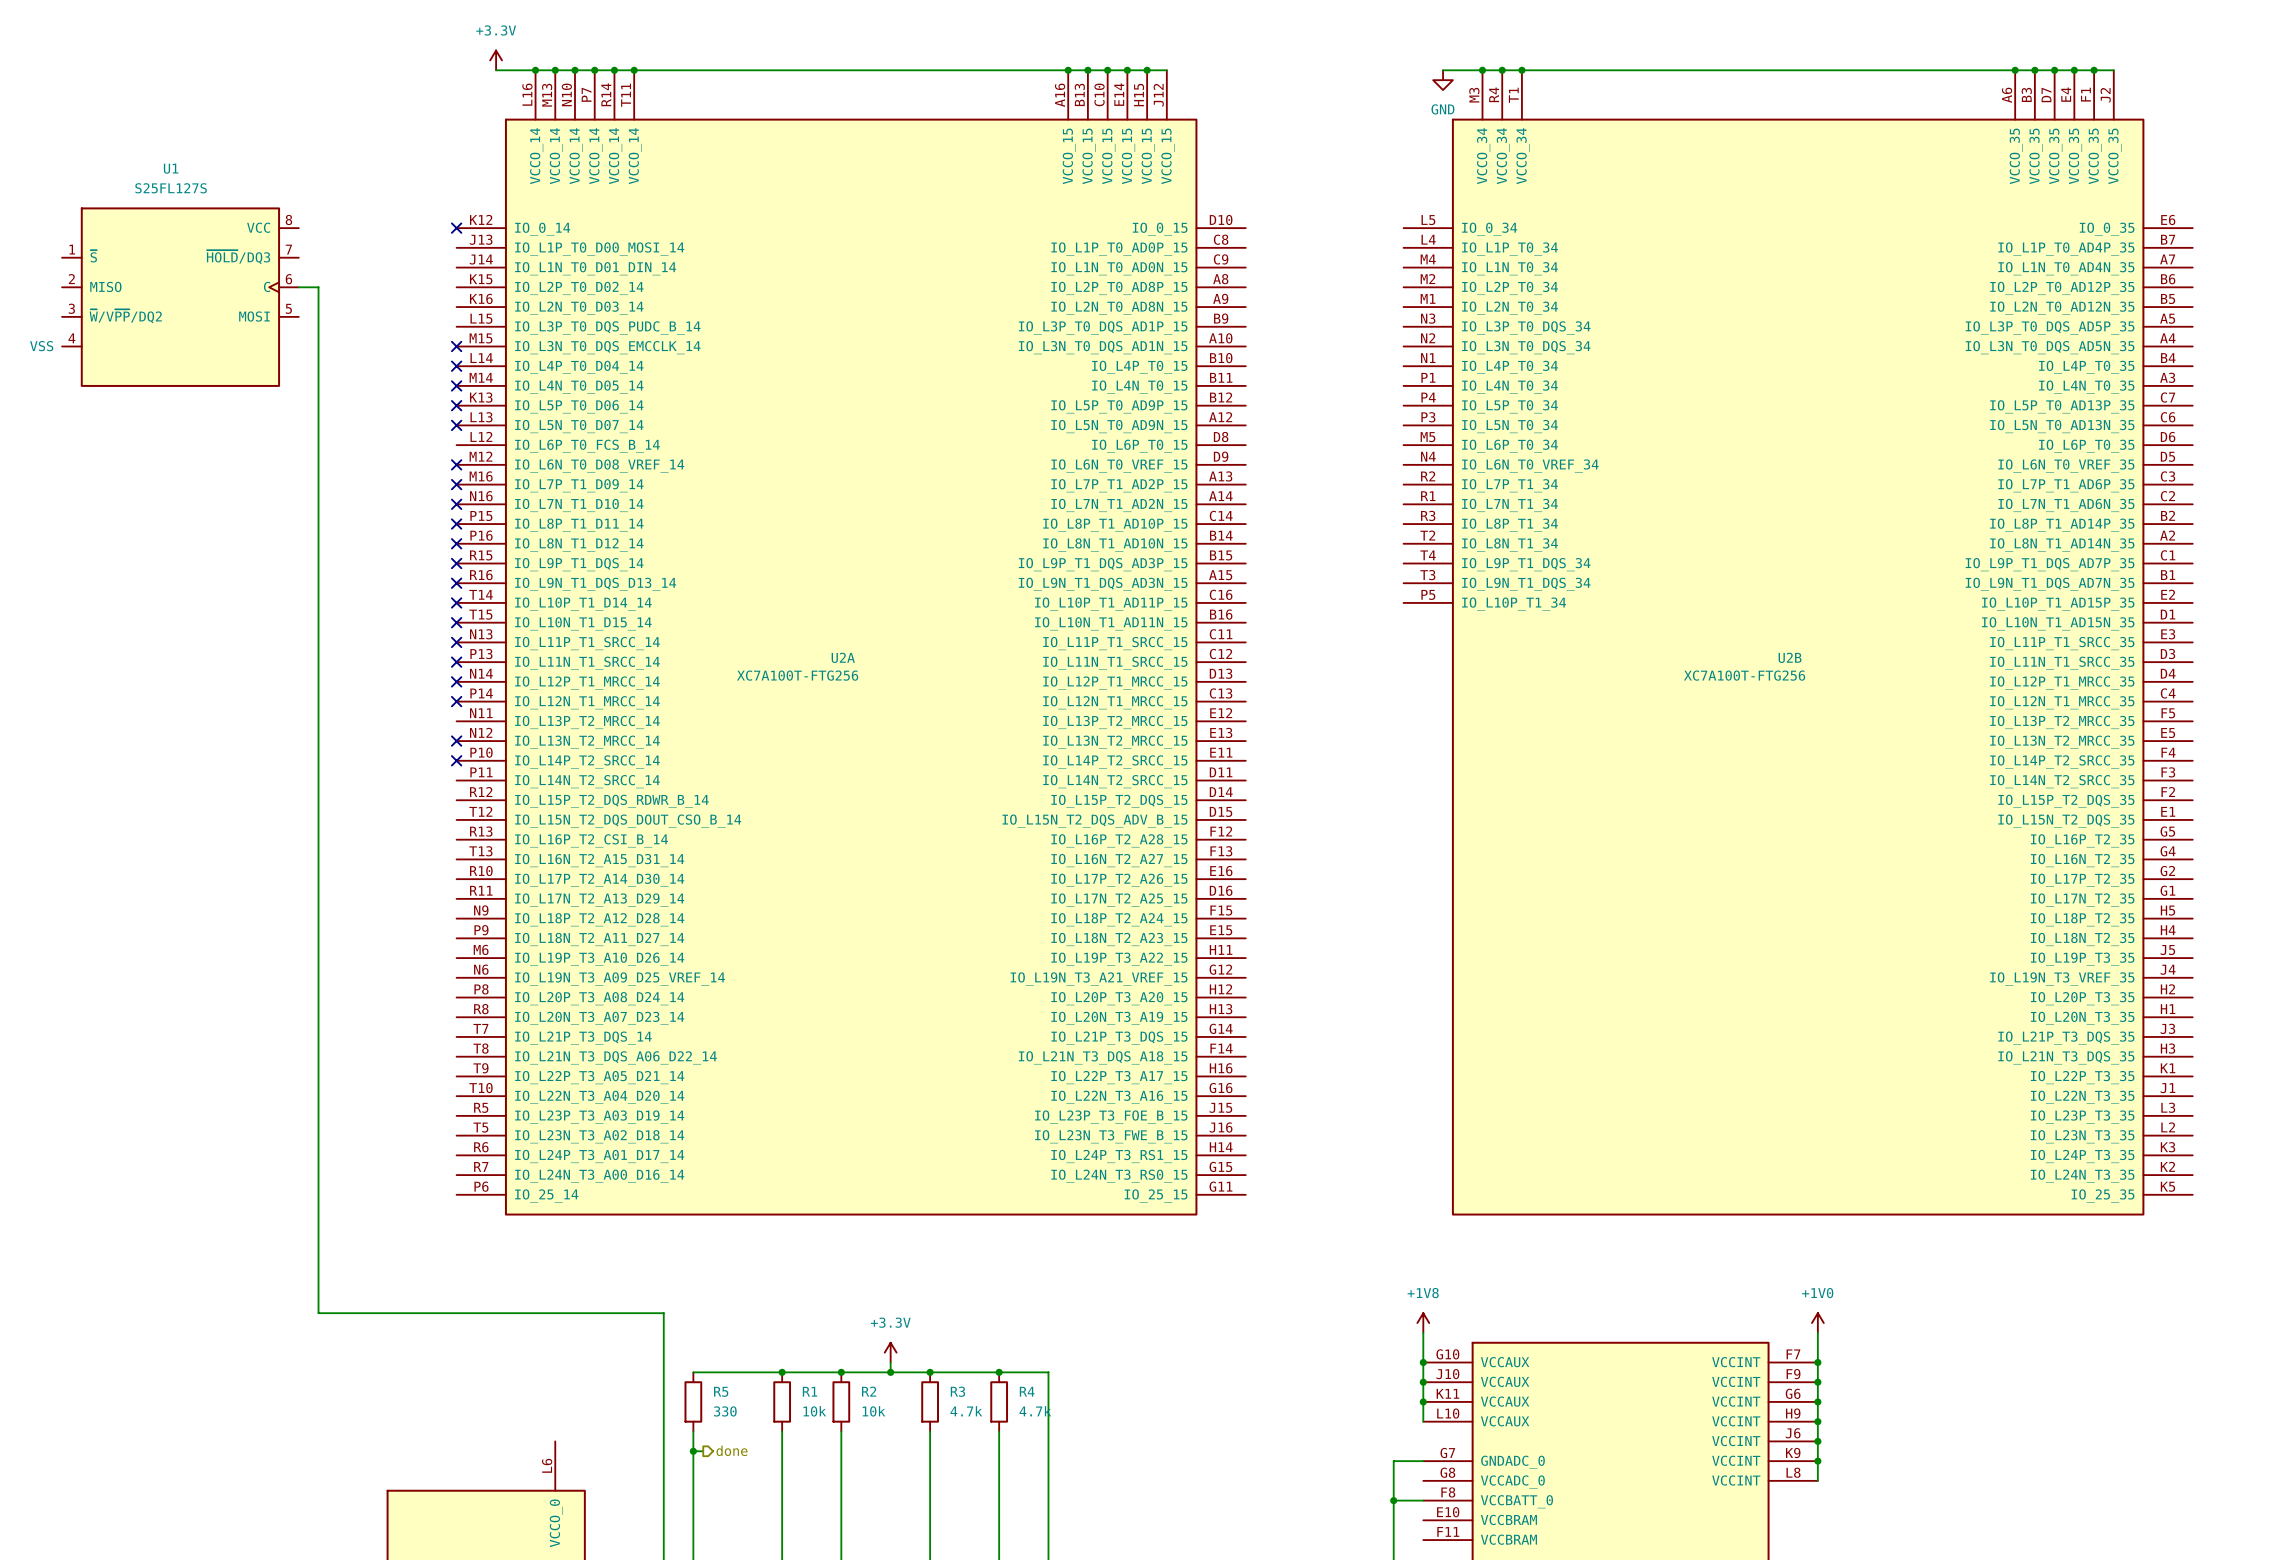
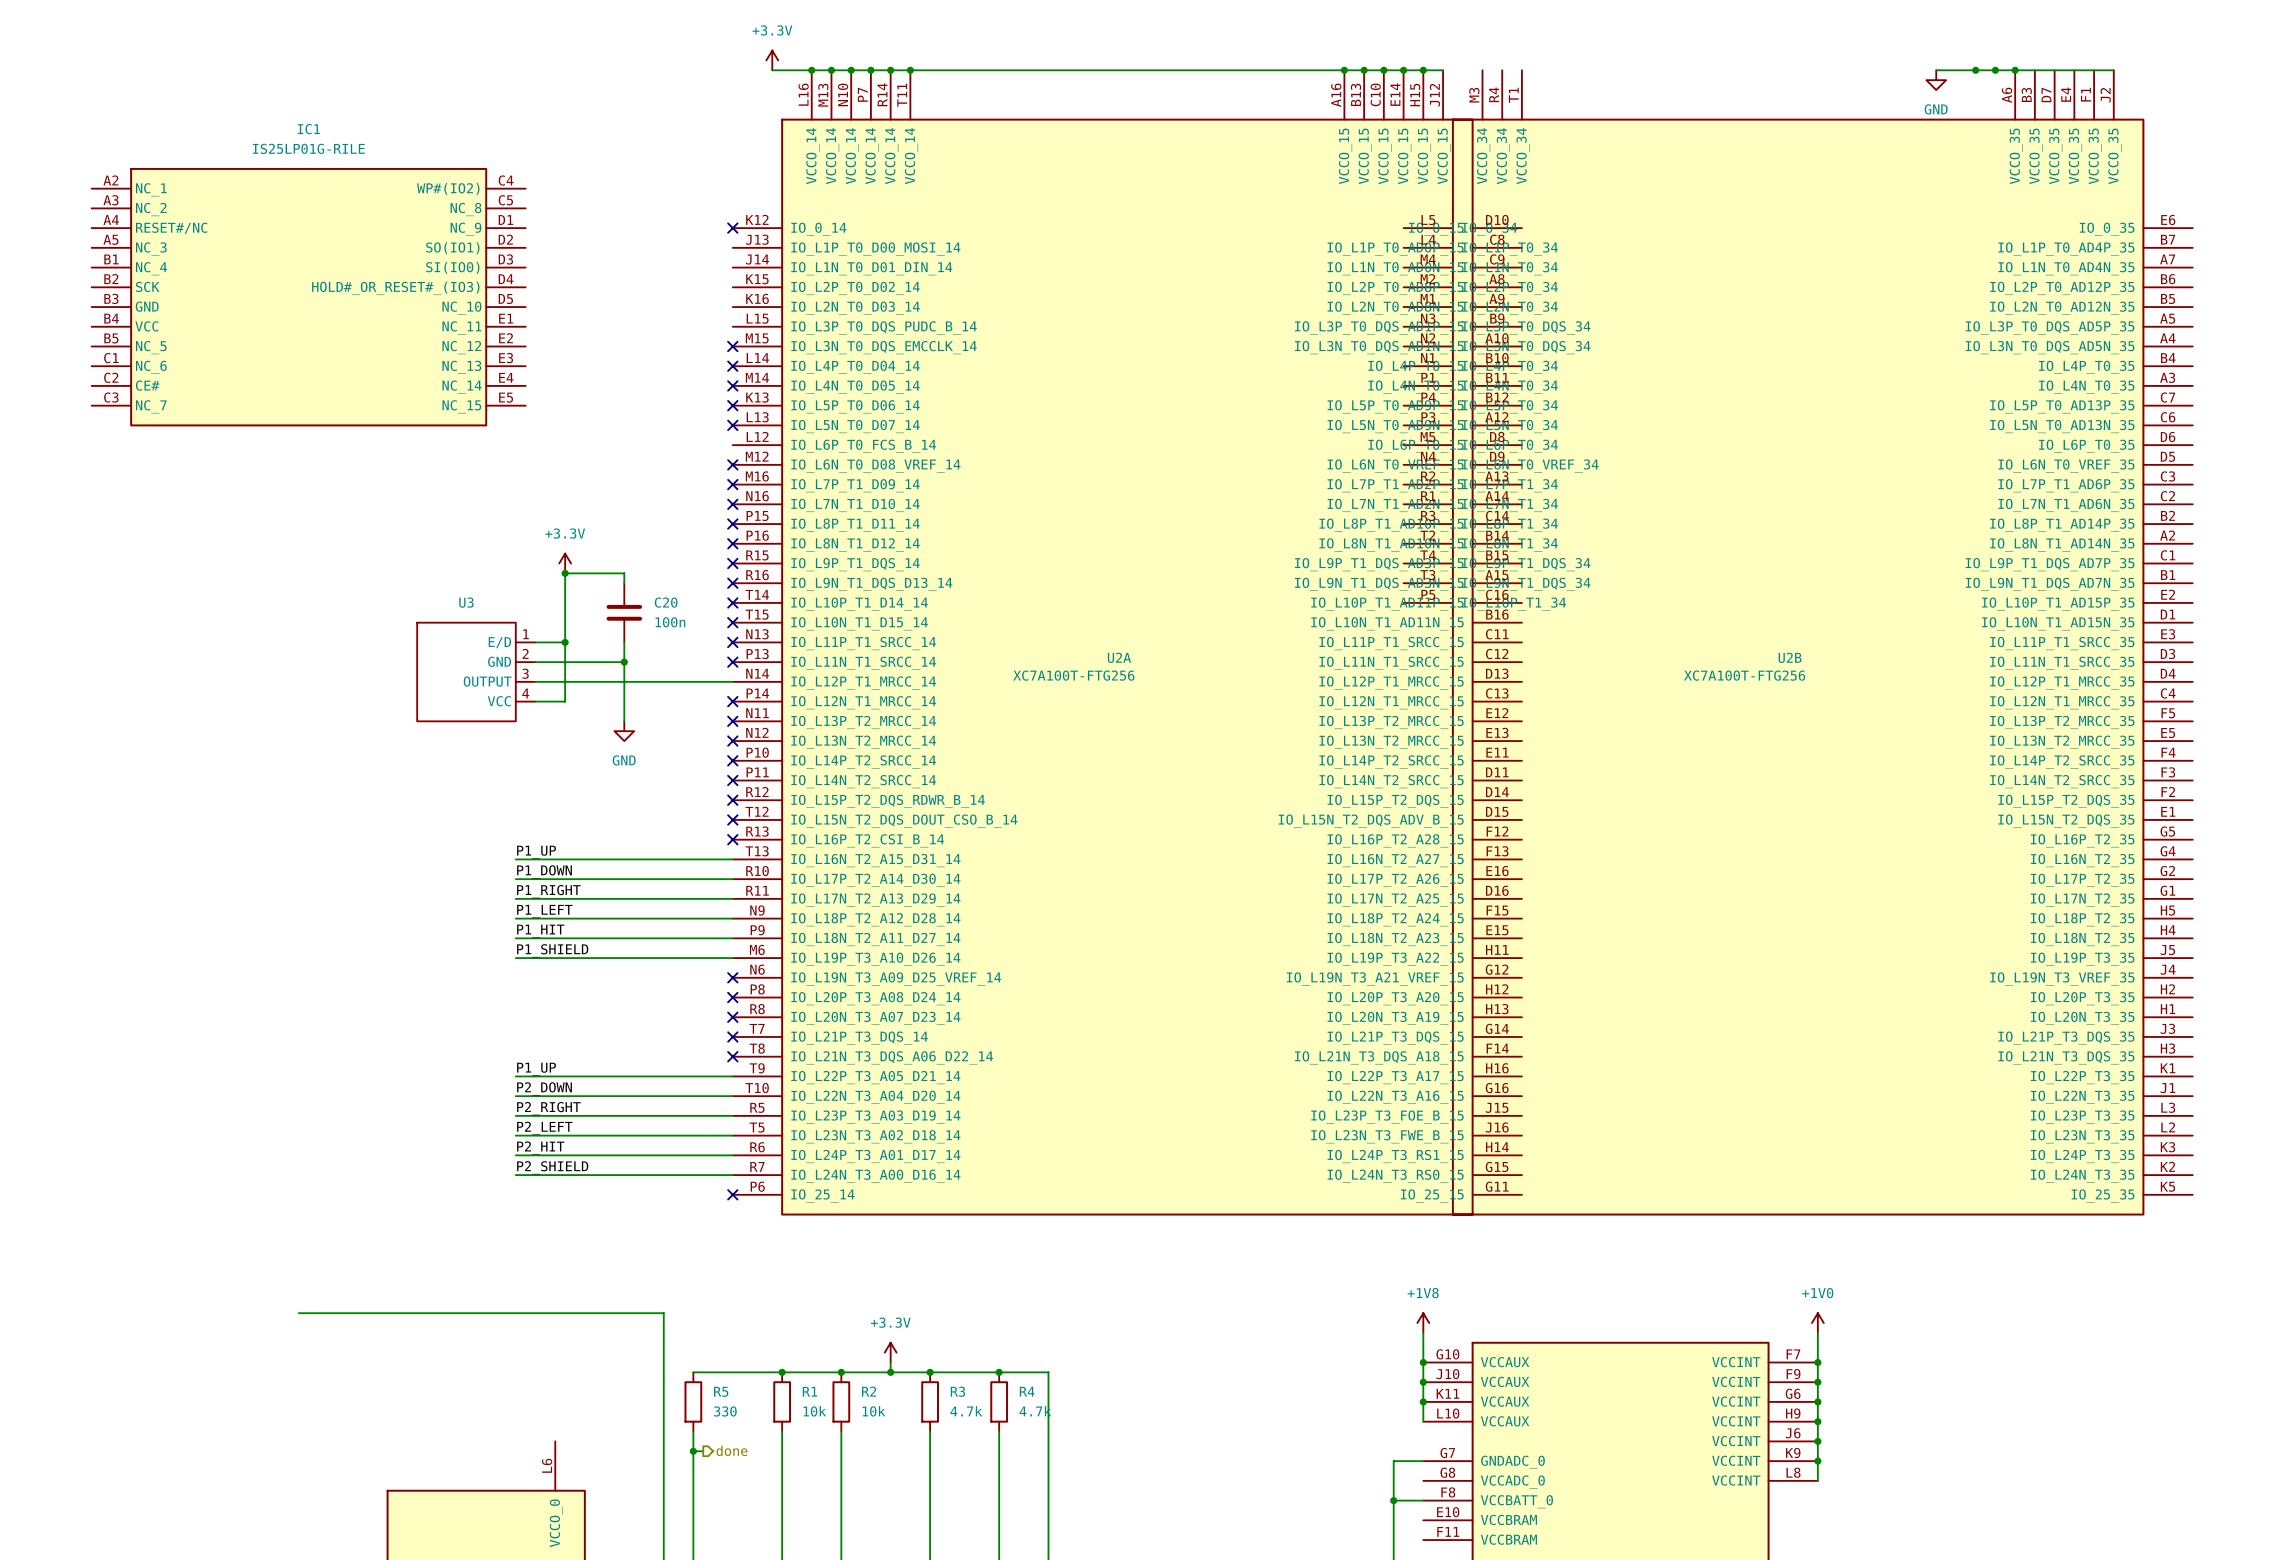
power symbol: +3.3V (496, 60) -> none
power symbol: none -> +3.3V (772, 60)
wire: (496, 70) (772, 70) -> none
junction: (535, 70) -> none
junction: (555, 70) -> none
junction: (574, 70) -> none
junction: (594, 70) -> none
junction: (614, 70) -> none
junction: (634, 70) -> none
junction: none -> (811, 70)
junction: none -> (831, 70)
junction: none -> (851, 70)
junction: none -> (870, 70)
junction: none -> (890, 70)
junction: none -> (910, 70)
junction: (1068, 70) -> none
junction: (1087, 70) -> none
junction: (1107, 70) -> none
junction: (1127, 70) -> none
junction: (1147, 70) -> none
junction: none -> (1344, 70)
junction: none -> (1364, 70)
junction: none -> (1383, 70)
junction: none -> (1403, 70)
junction: none -> (1423, 70)
wire: (1443, 70) (1936, 70) -> (1443, 70) (1166, 70)
junction: (1482, 70) -> none
junction: (1502, 70) -> none
junction: (1521, 70) -> none
junction: none -> (1975, 70)
junction: none -> (1995, 70)
junction: (2034, 70) -> none
junction: (2054, 70) -> none
junction: (2074, 70) -> none
junction: (2094, 70) -> none
power symbol: GND (1443, 80) -> none
power symbol: none -> GND (1936, 80)
no-connect mark: (456, 228) -> none
no-connect mark: none -> (732, 228)
wire: (298, 287) (318, 287) (318, 1313) -> (298, 1313) (318, 1313)
U1: S25FL127S (180, 297) -> none
IC1: none -> IS25LP01G-RILE (308, 297)
no-connect mark: (456, 346) -> none
no-connect mark: none -> (732, 346)
no-connect mark: (456, 366) -> none
no-connect mark: none -> (732, 366)
no-connect mark: (456, 385) -> none
no-connect mark: none -> (732, 385)
no-connect mark: (456, 405) -> none
no-connect mark: none -> (732, 405)
no-connect mark: (456, 425) -> none
no-connect mark: none -> (732, 425)
no-connect mark: (456, 464) -> none
no-connect mark: none -> (732, 464)
no-connect mark: (456, 484) -> none
no-connect mark: none -> (732, 484)
no-connect mark: (456, 504) -> none
no-connect mark: none -> (732, 504)
no-connect mark: (456, 524) -> none
no-connect mark: none -> (732, 524)
no-connect mark: (456, 543) -> none
no-connect mark: none -> (732, 543)
no-connect mark: (456, 563) -> none
power symbol: none -> +3.3V (565, 563)
no-connect mark: none -> (732, 563)
junction: none -> (565, 573)
no-connect mark: (456, 583) -> none
no-connect mark: none -> (732, 583)
no-connect mark: (456, 602) -> none
no-connect mark: none -> (732, 602)
C20: none -> 100n (624, 612)
no-connect mark: (456, 622) -> none
no-connect mark: none -> (732, 622)
no-connect mark: (456, 642) -> none
junction: none -> (565, 642)
no-connect mark: none -> (732, 642)
U2A position: (851, 642) -> (1127, 642)
no-connect mark: (456, 662) -> none
junction: none -> (624, 662)
no-connect mark: none -> (732, 662)
U3: none -> (476, 672)
no-connect mark: (456, 681) -> none
no-connect mark: (456, 701) -> none
no-connect mark: none -> (732, 701)
no-connect mark: none -> (732, 721)
power symbol: none -> GND (624, 731)
no-connect mark: (456, 741) -> none
no-connect mark: none -> (732, 741)
no-connect mark: (456, 760) -> none
no-connect mark: none -> (732, 760)
no-connect mark: none -> (732, 780)
no-connect mark: none -> (732, 800)
no-connect mark: none -> (732, 819)
no-connect mark: none -> (732, 839)
label: none -> P1_UP (536, 852)
label: none -> P1_DOWN (544, 871)
label: none -> P1_RIGHT (548, 891)
label: none -> P1_LEFT (544, 911)
label: none -> P1_HIT (540, 931)
label: none -> P1_SHIELD (552, 950)
no-connect mark: none -> (732, 977)
no-connect mark: none -> (732, 997)
no-connect mark: none -> (732, 1017)
no-connect mark: none -> (732, 1036)
no-connect mark: none -> (732, 1056)
label: none -> P1_UP (536, 1069)
label: none -> P2_DOWN (544, 1088)
label: none -> P2_RIGHT (548, 1108)
label: none -> P2_LEFT (544, 1128)
label: none -> P2_HIT (540, 1148)
label: none -> P2_SHIELD (552, 1167)
no-connect mark: none -> (732, 1194)

